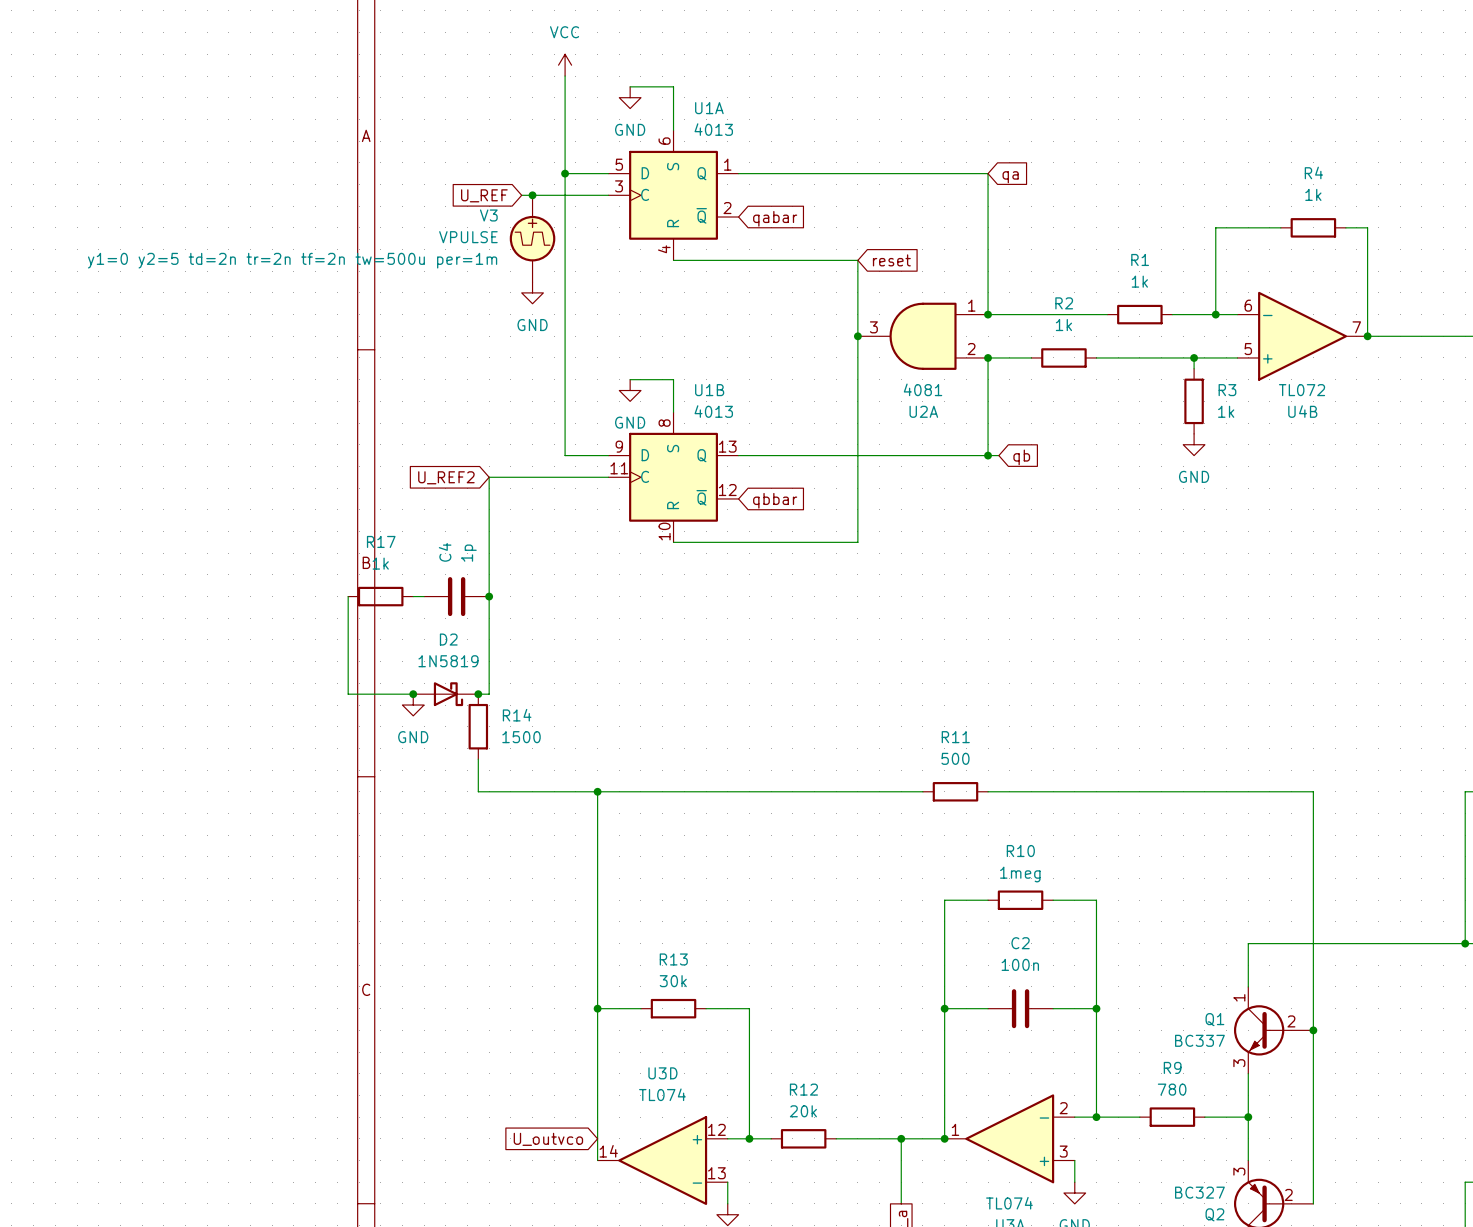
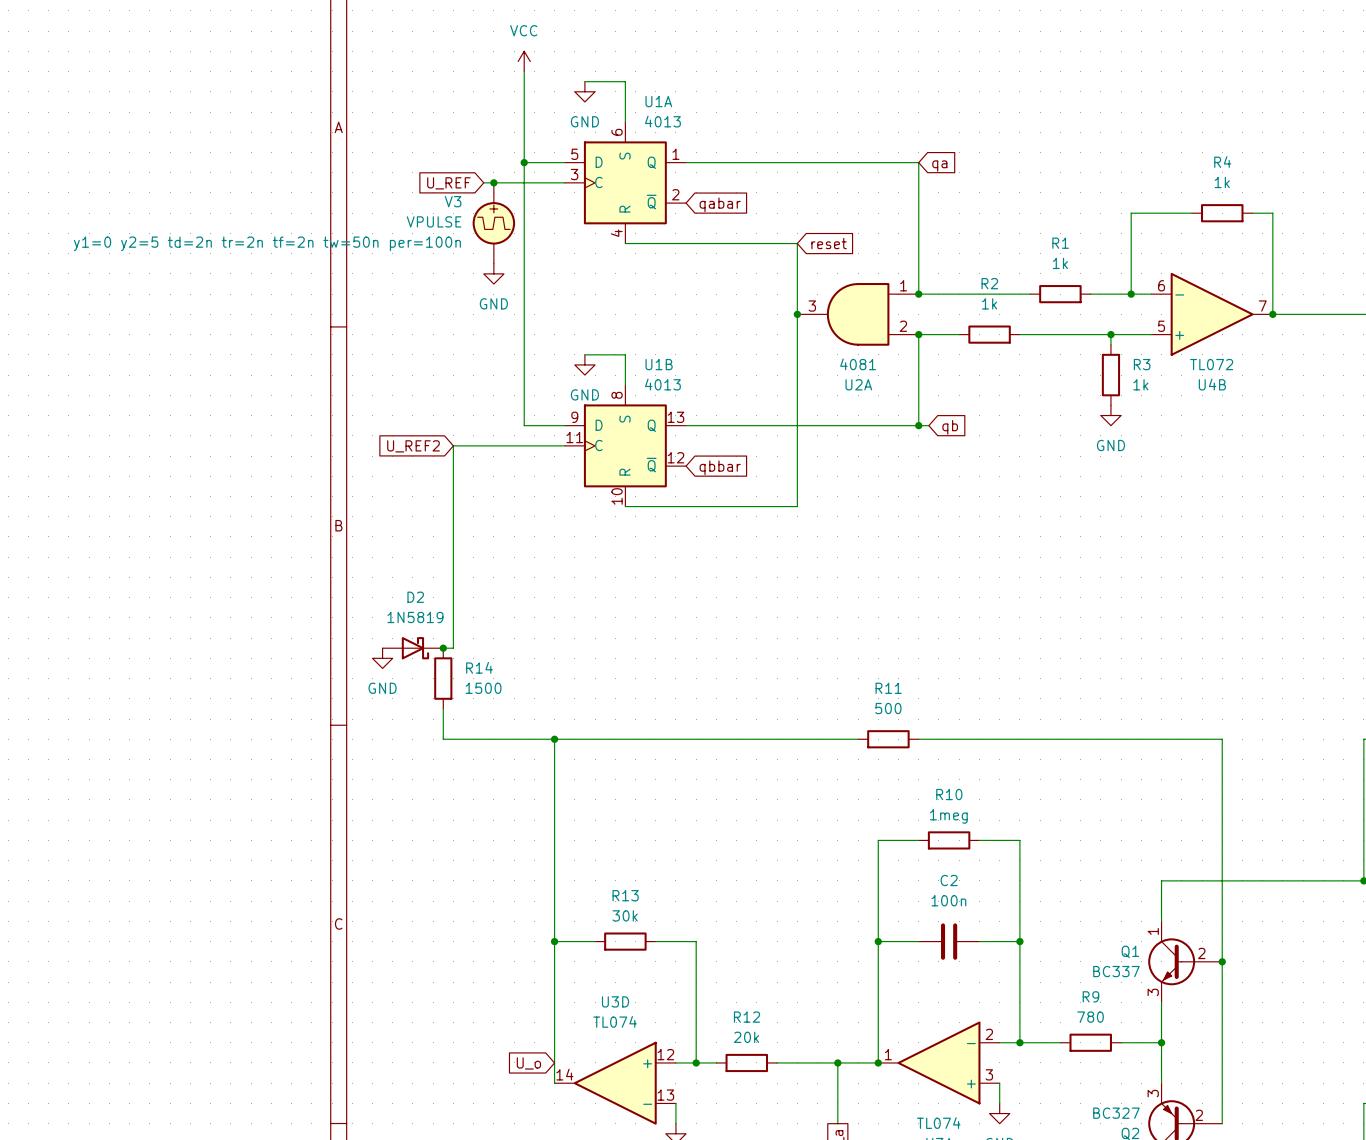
V3 text: y1=0 y2=5 td=2n tr=2n tf=2n tw=500u per=1m (292, 260) -> y1=0 y2=5 td=2n tr=2n tf=2n tw=50n per=100n (267, 243)
wire: (348, 596) (348, 694) (413, 694) -> none
R17: 1k (380, 596) -> none
wire: (413, 596) (424, 596) -> none
C4: 1p (456, 596) -> none
junction: (489, 596) -> none
junction: (413, 694) -> none
global label: U_outvco (548, 1139) -> U_o (528, 1063)

